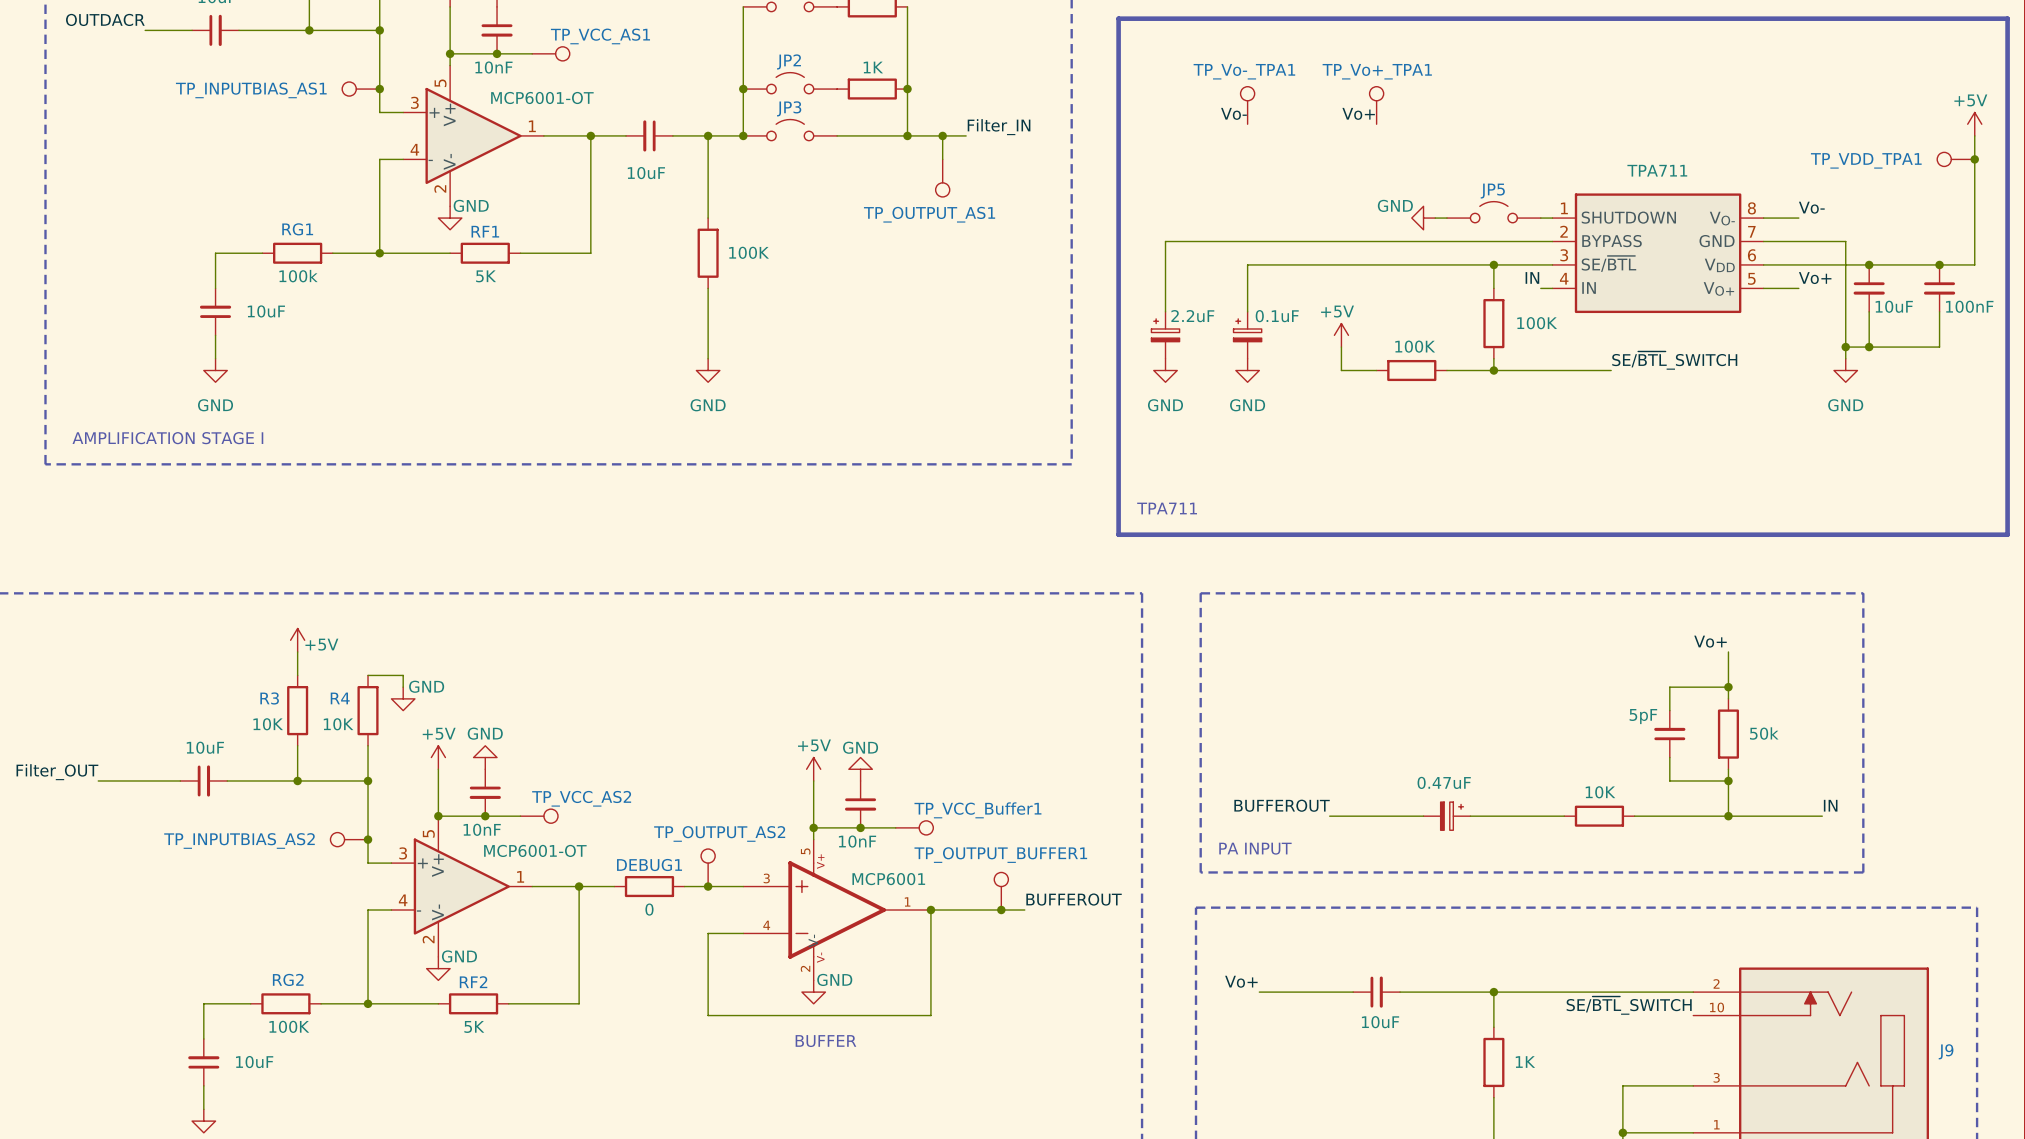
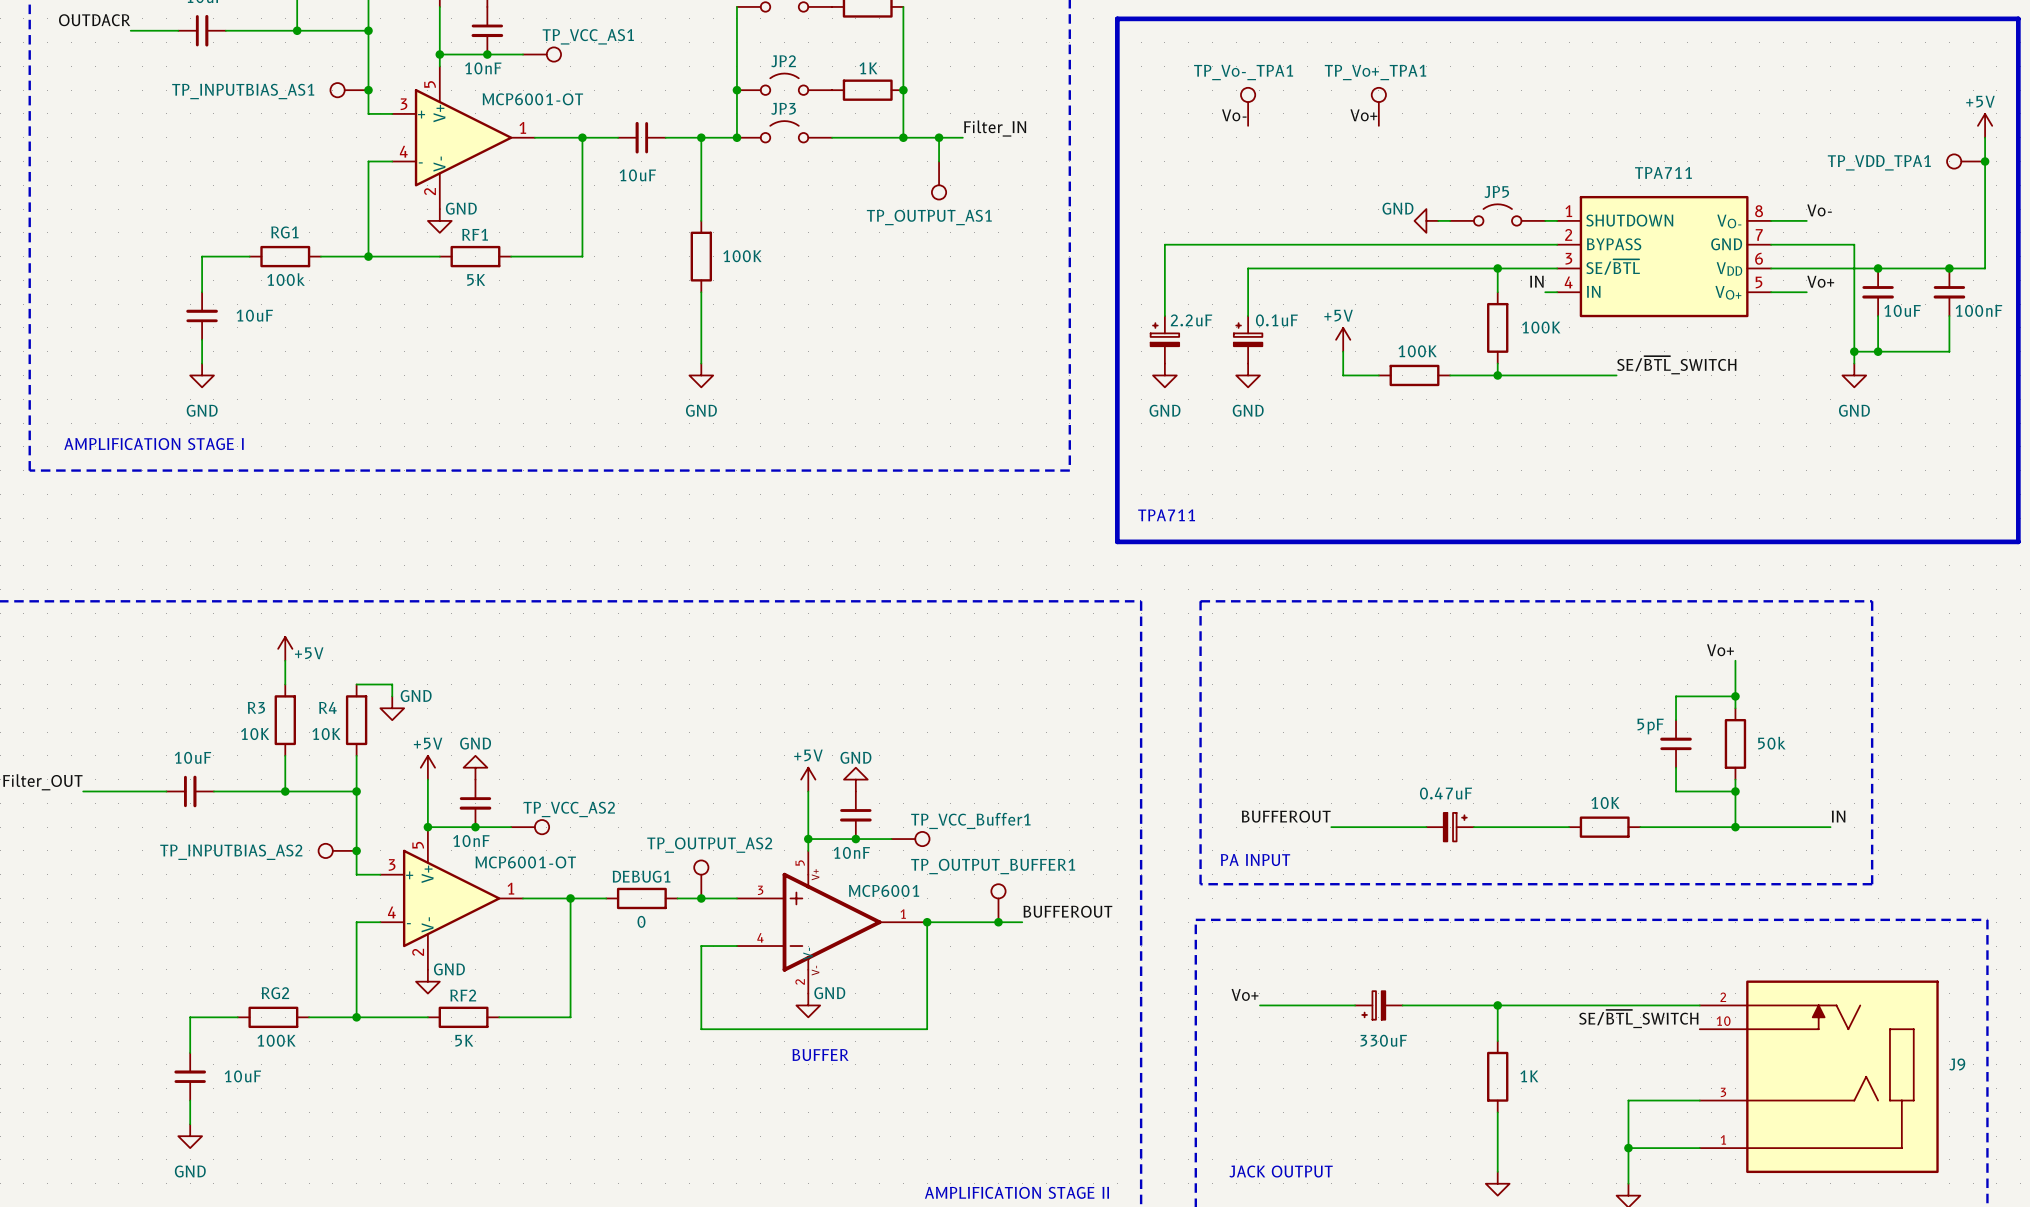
part symbol: [1353, 976, 1401, 1008] -> [1355, 991, 1403, 1020]
part value: 10uF (1380, 1022) -> 330uF (1383, 1040)

